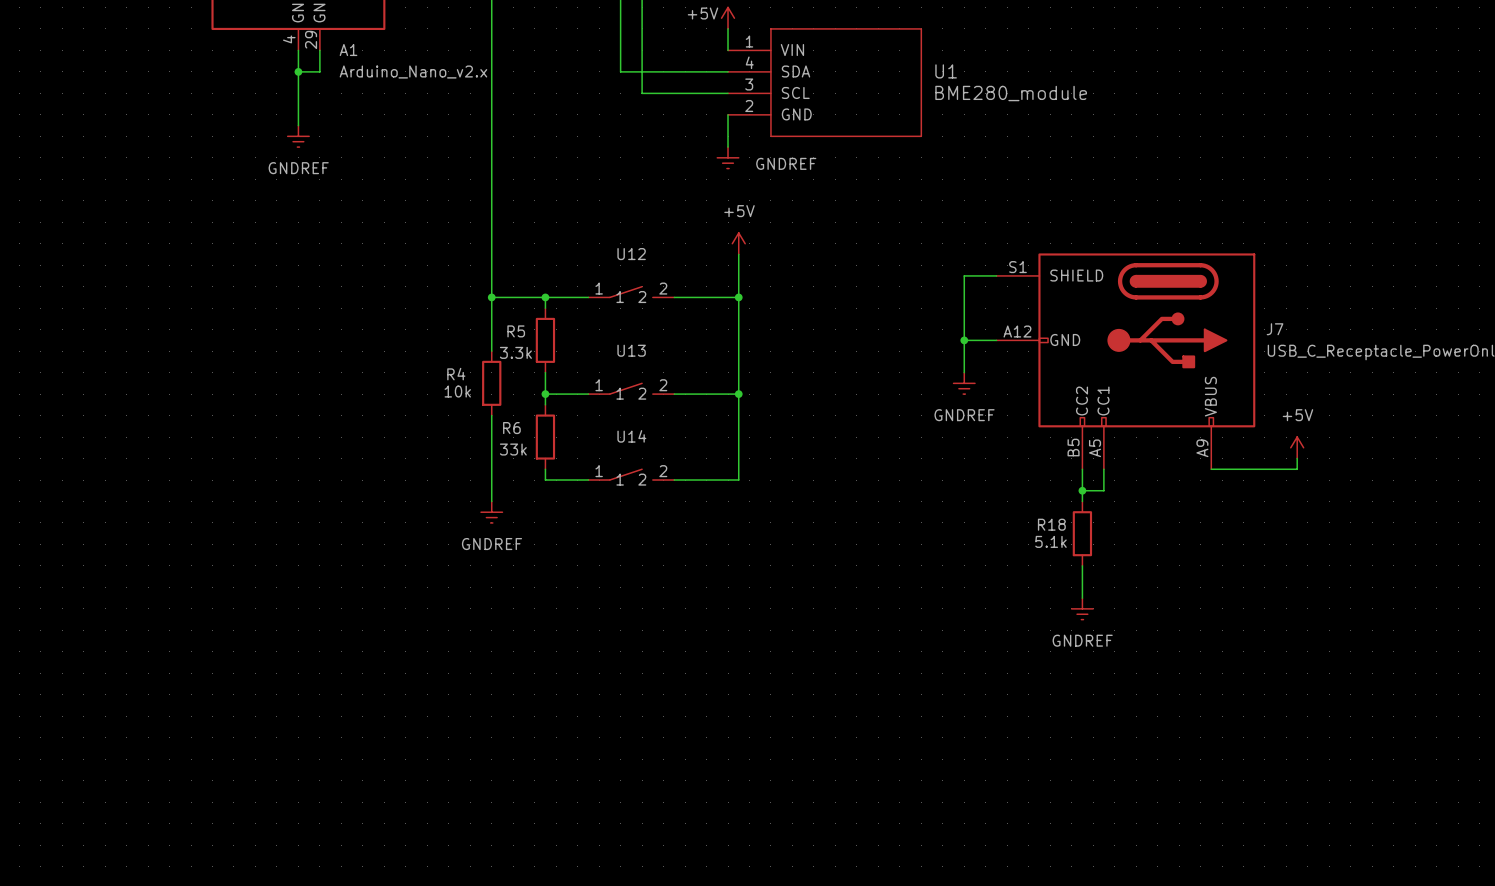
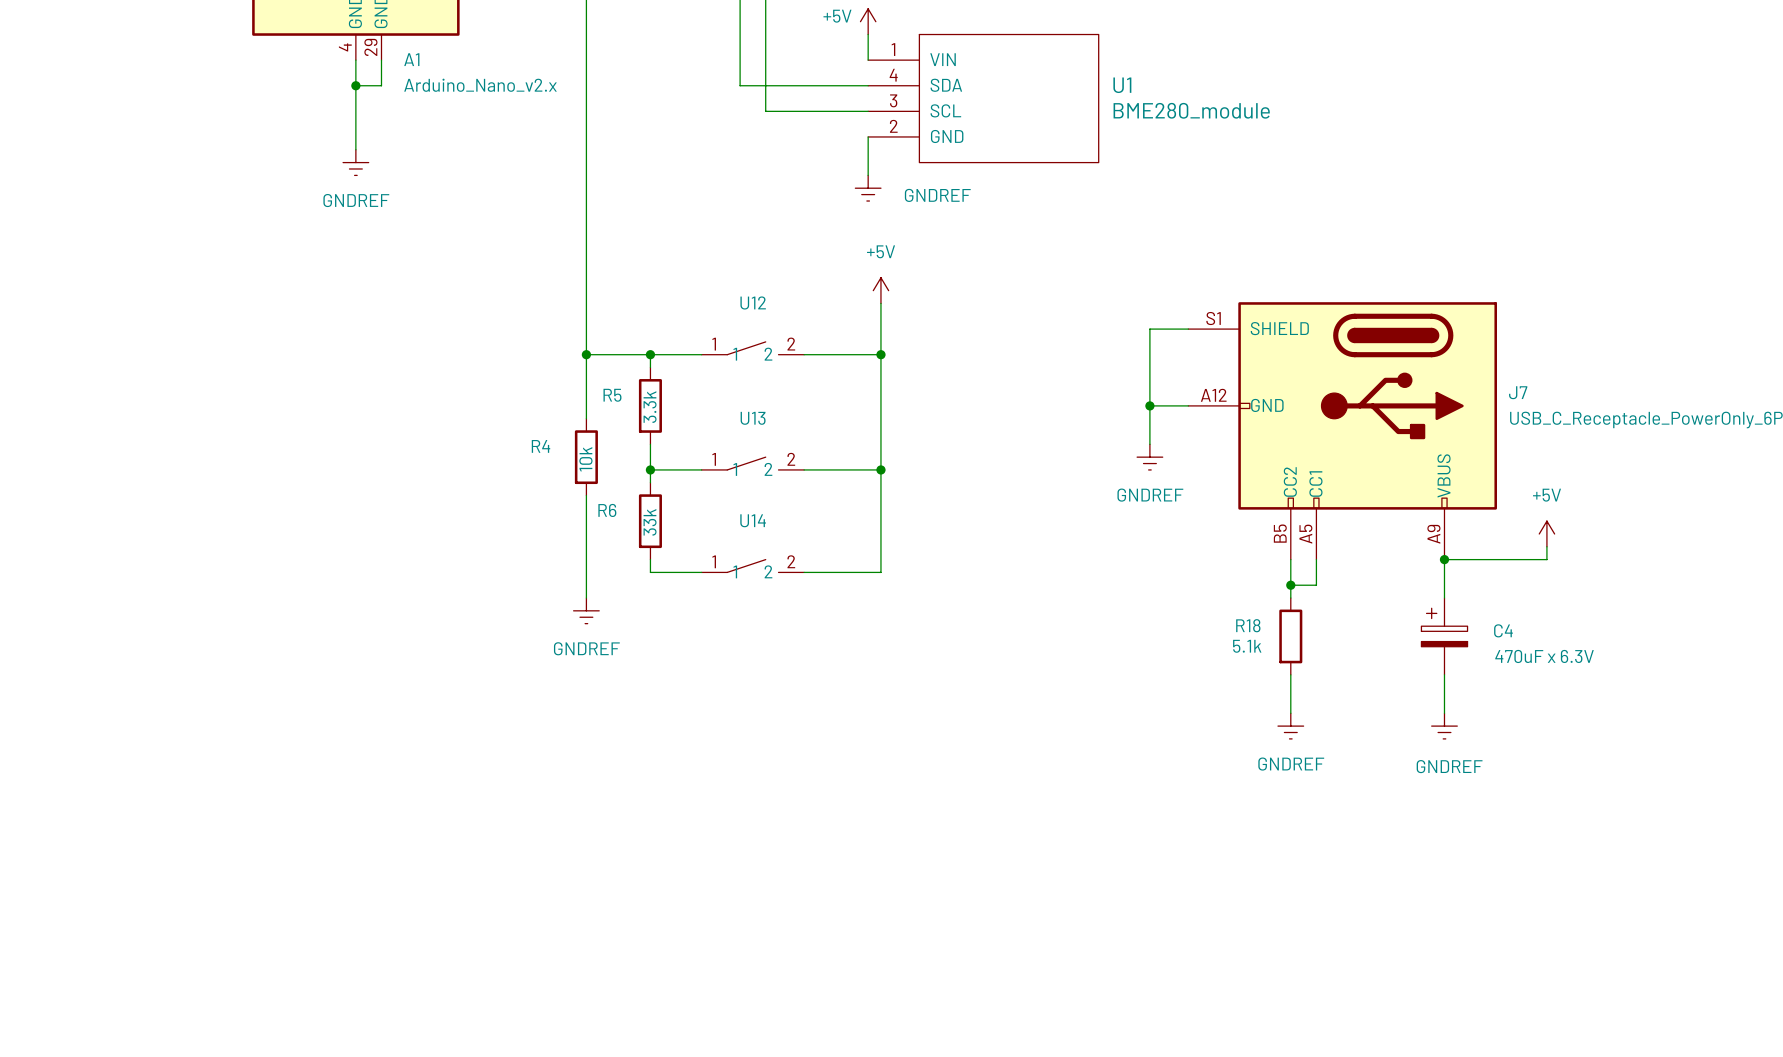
R5 value rotation: 0° (515, 352) -> 90° counterclockwise (650, 407)
R4 value rotation: 0° (457, 391) -> 90° counterclockwise (585, 459)
R6 value rotation: 0° (513, 449) -> 90° counterclockwise (650, 522)
wire: none -> (1444, 559) (1444, 598)
junction: none -> (1444, 559)
C4: none -> 470uF x 6.3V (1444, 636)
wire: none -> (1444, 674) (1444, 713)
power symbol: none -> GNDREF (1444, 726)

